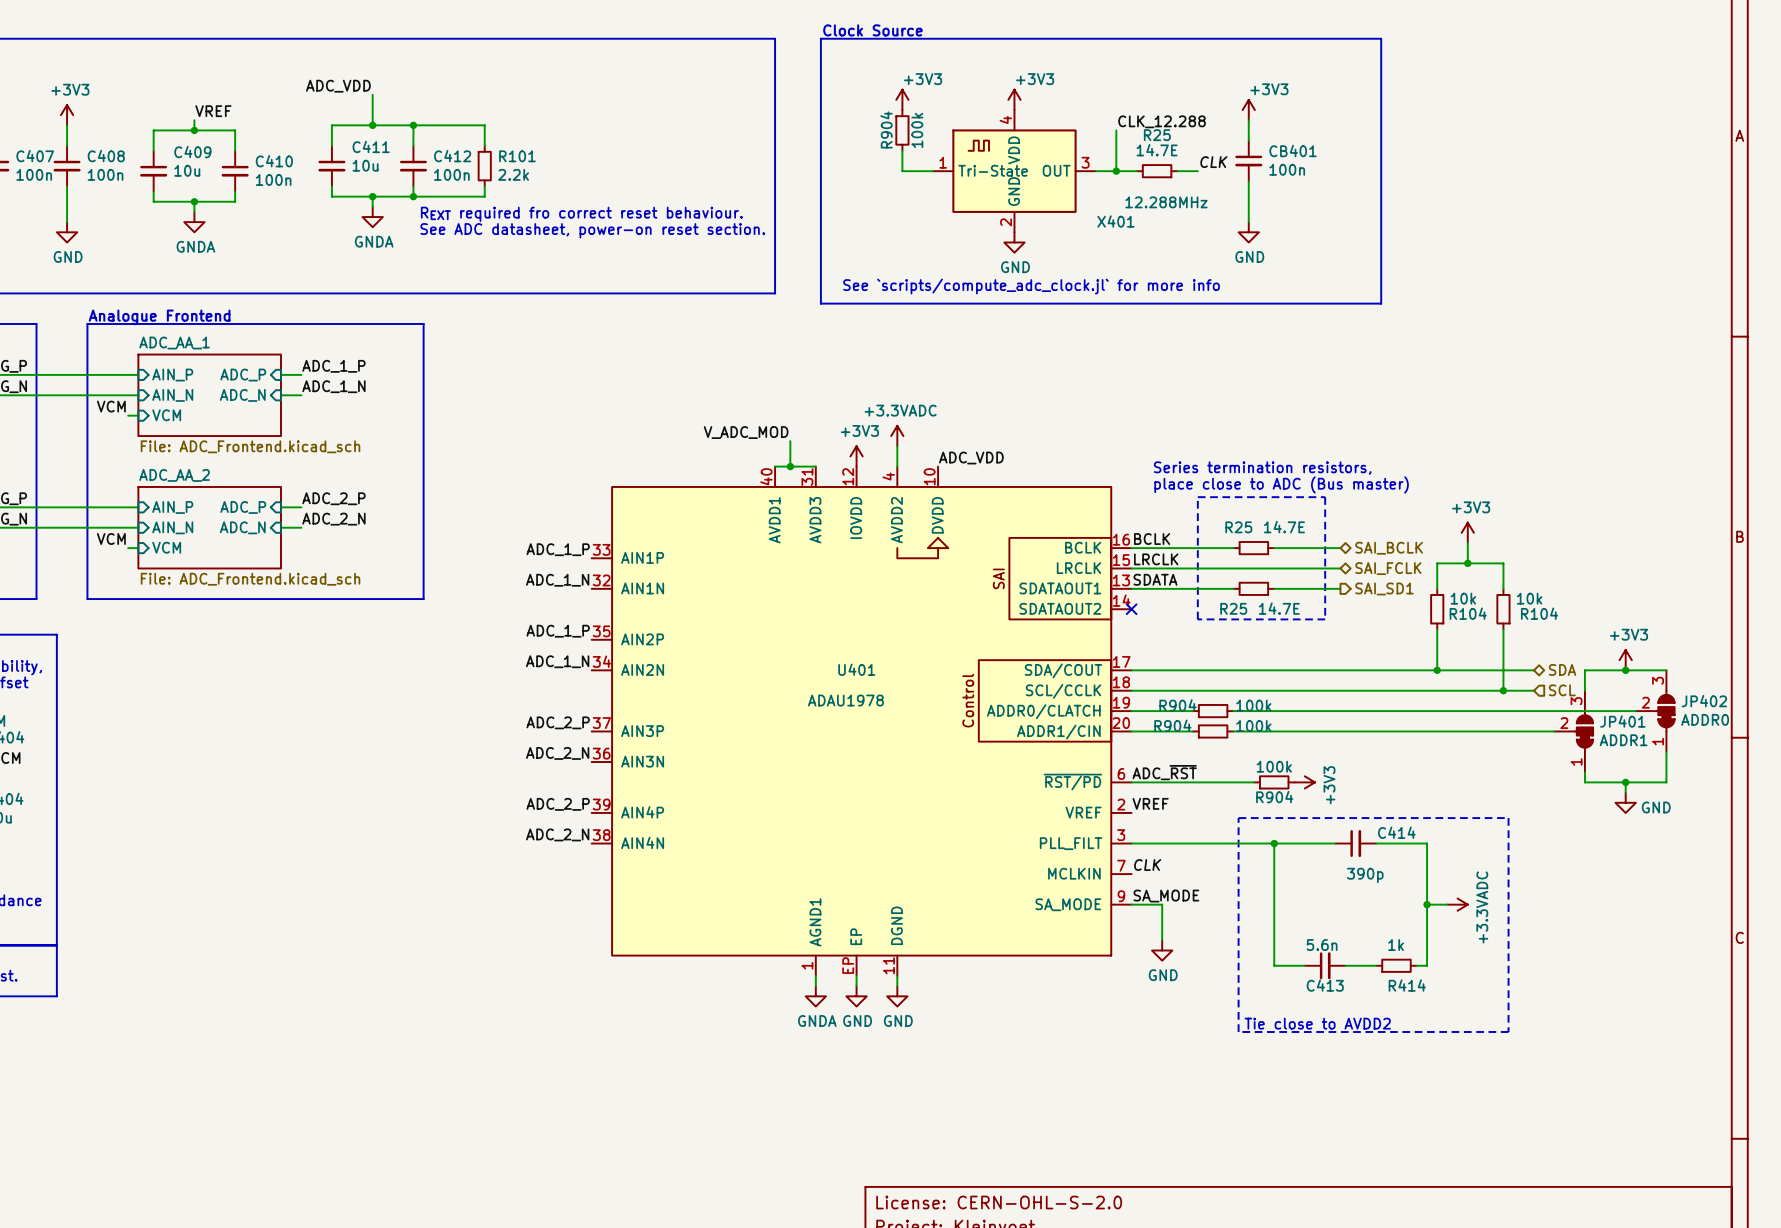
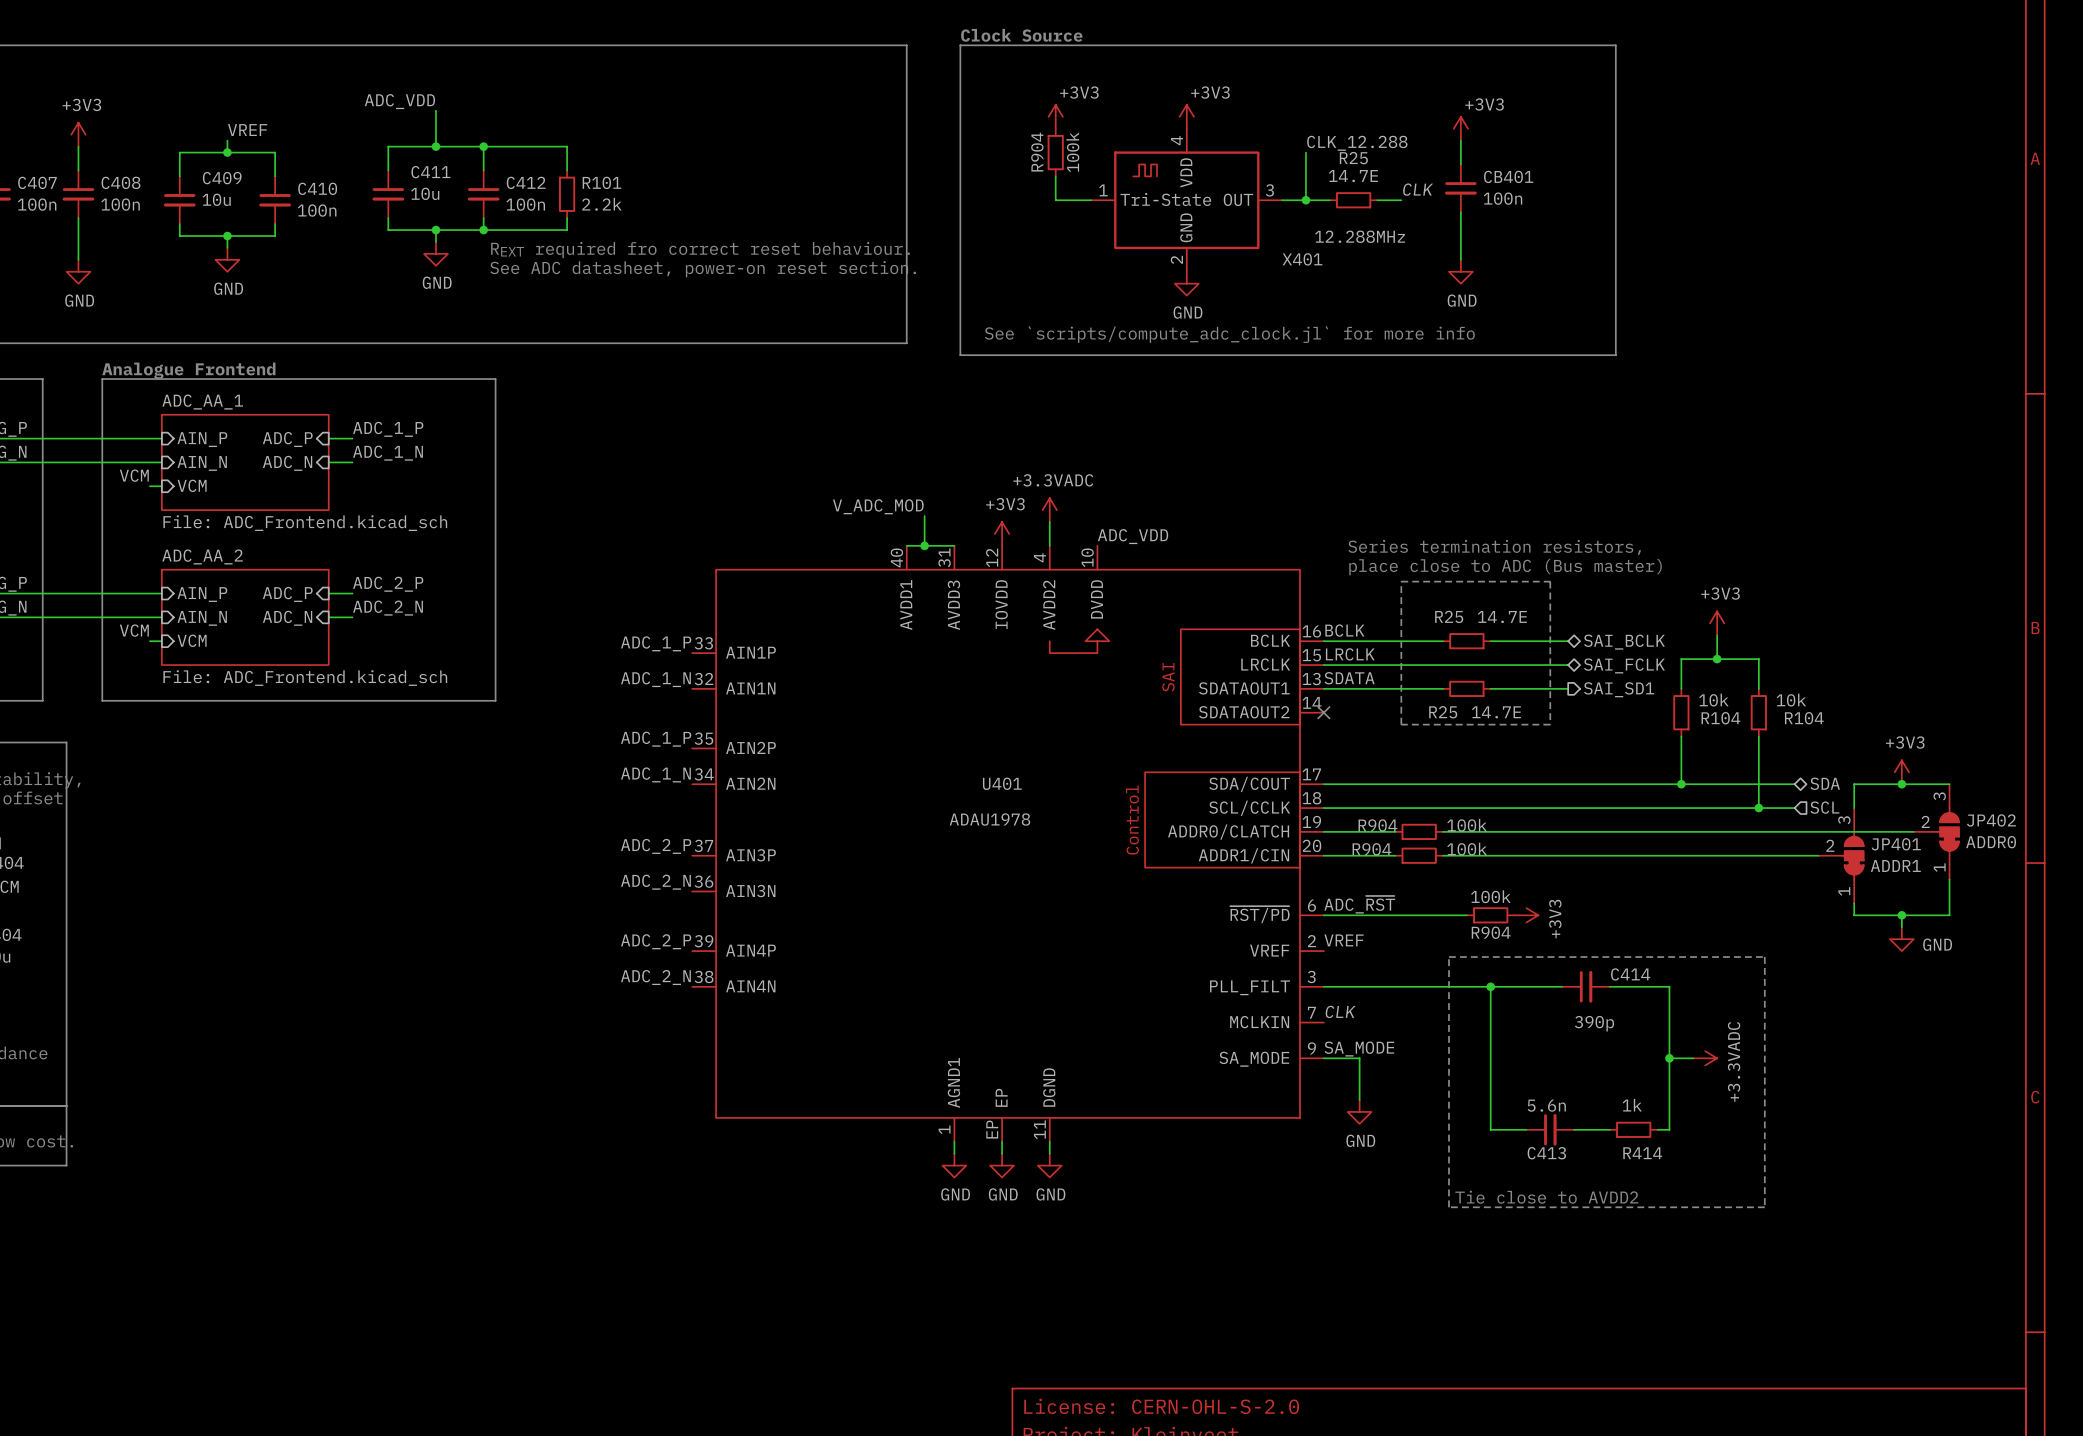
power symbol: GNDA (372, 217) -> GND (435, 253)
power symbol: GNDA (194, 222) -> GND (227, 259)
power symbol: GNDA (815, 996) -> GND (954, 1165)

